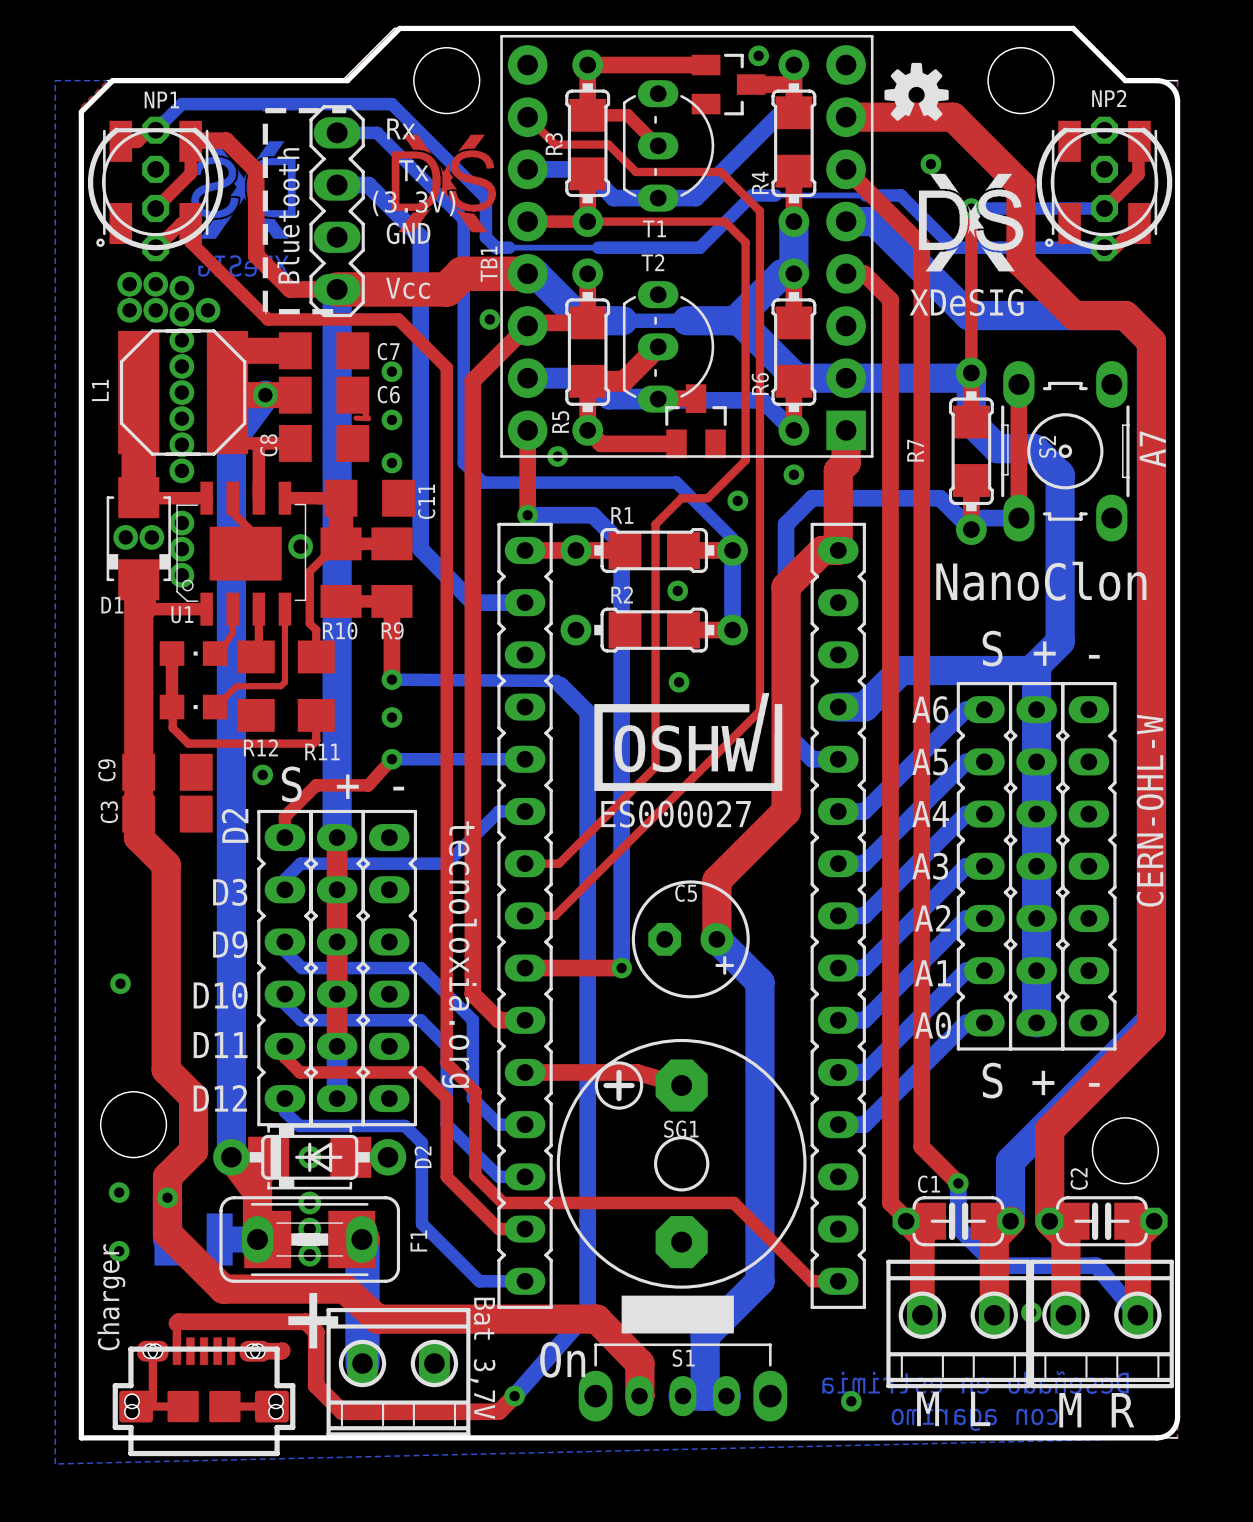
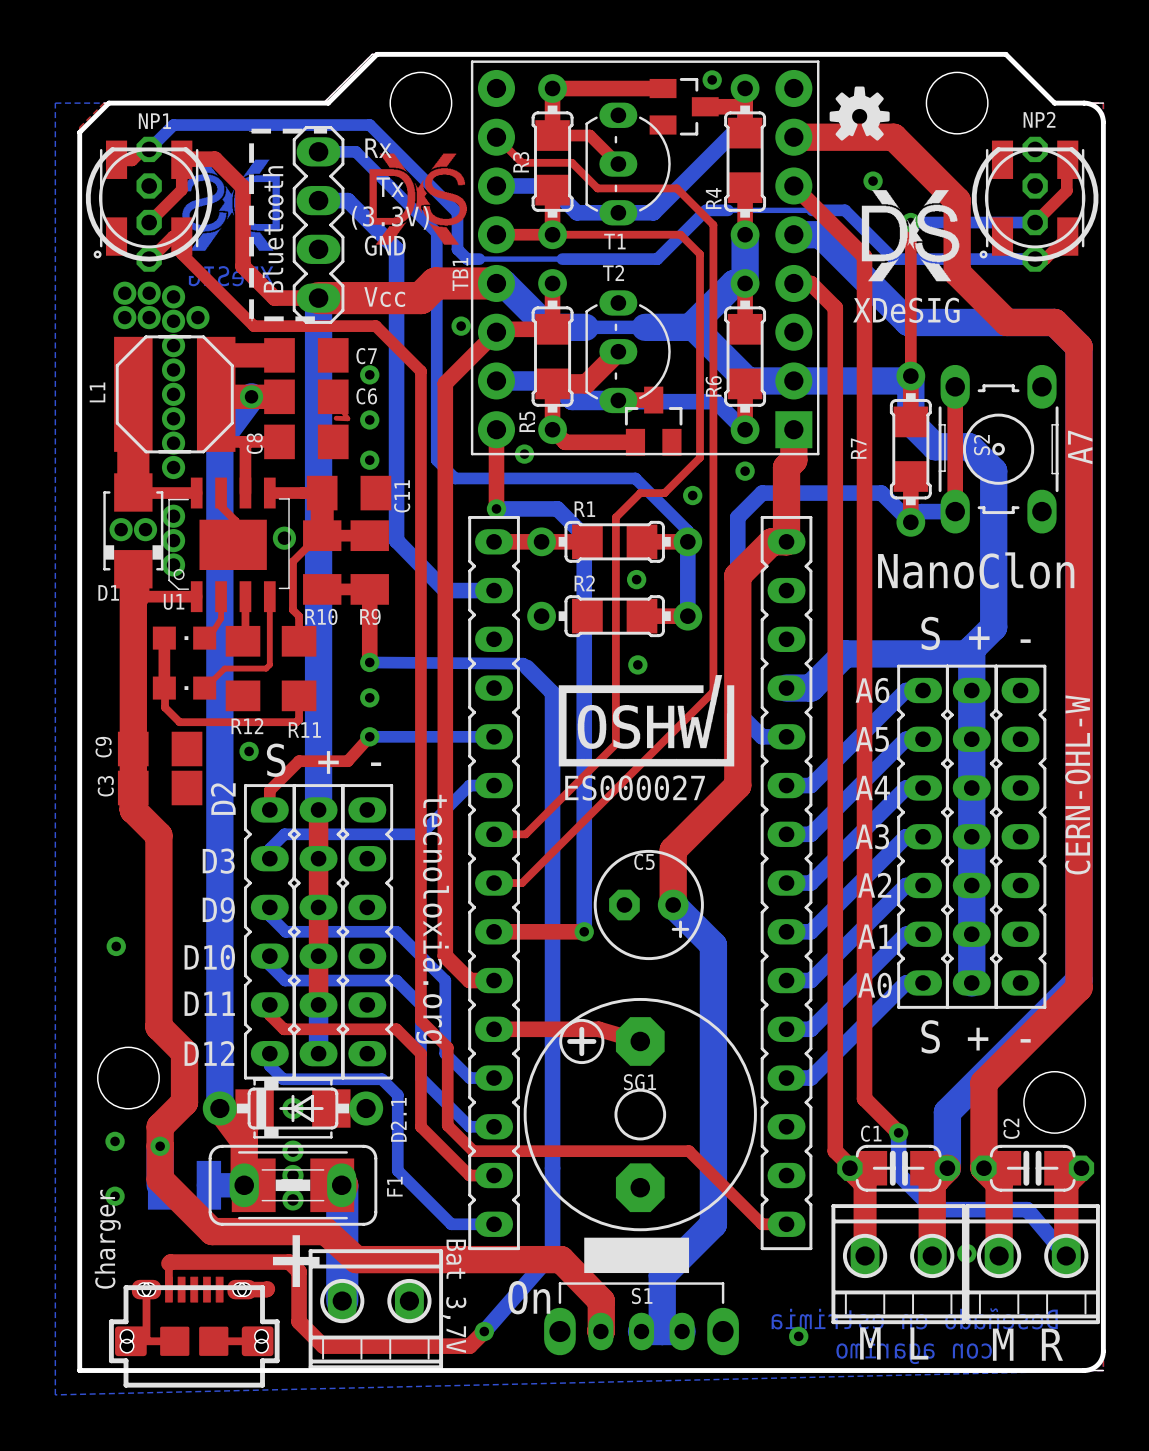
D2 name: D2 (422, 1157) -> D2.1 (398, 1119)

